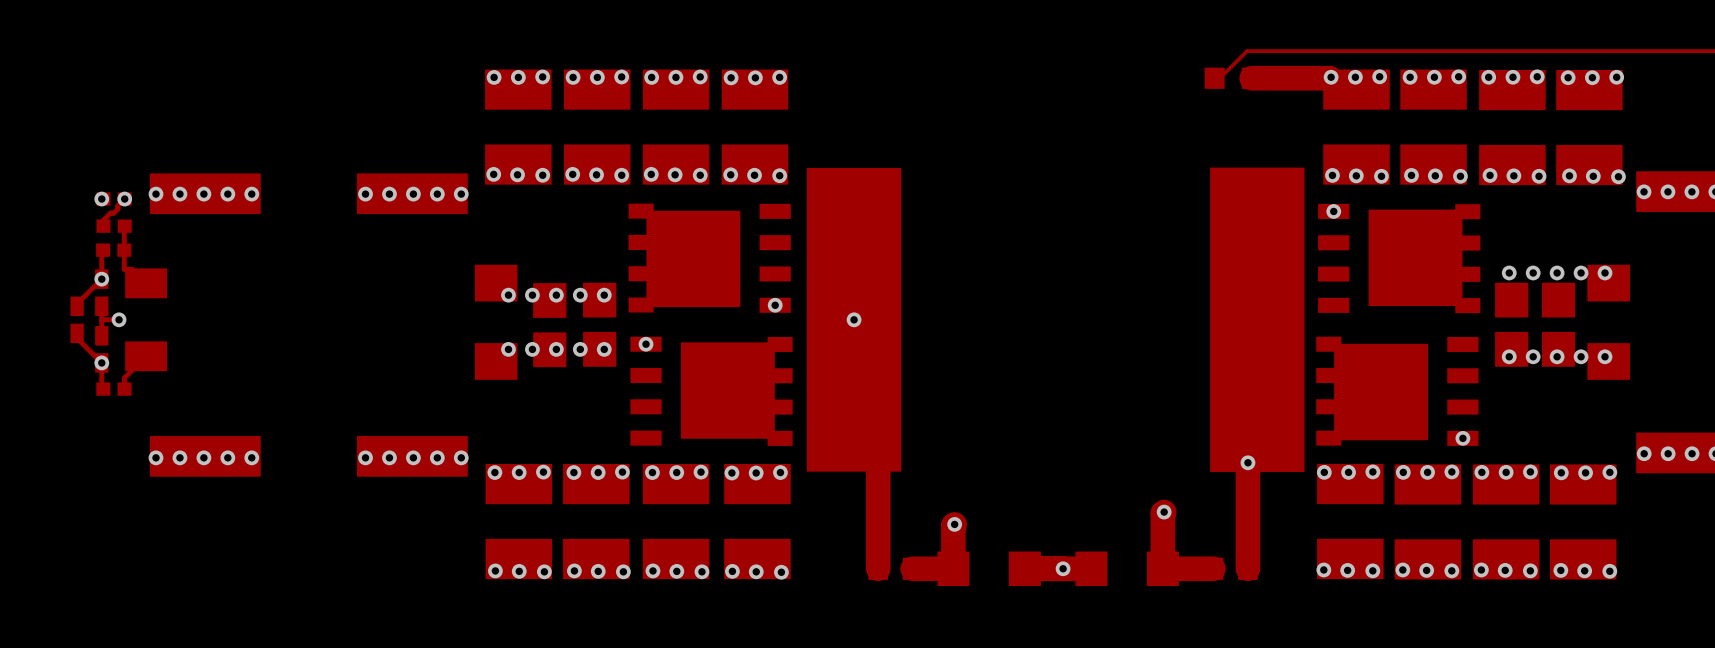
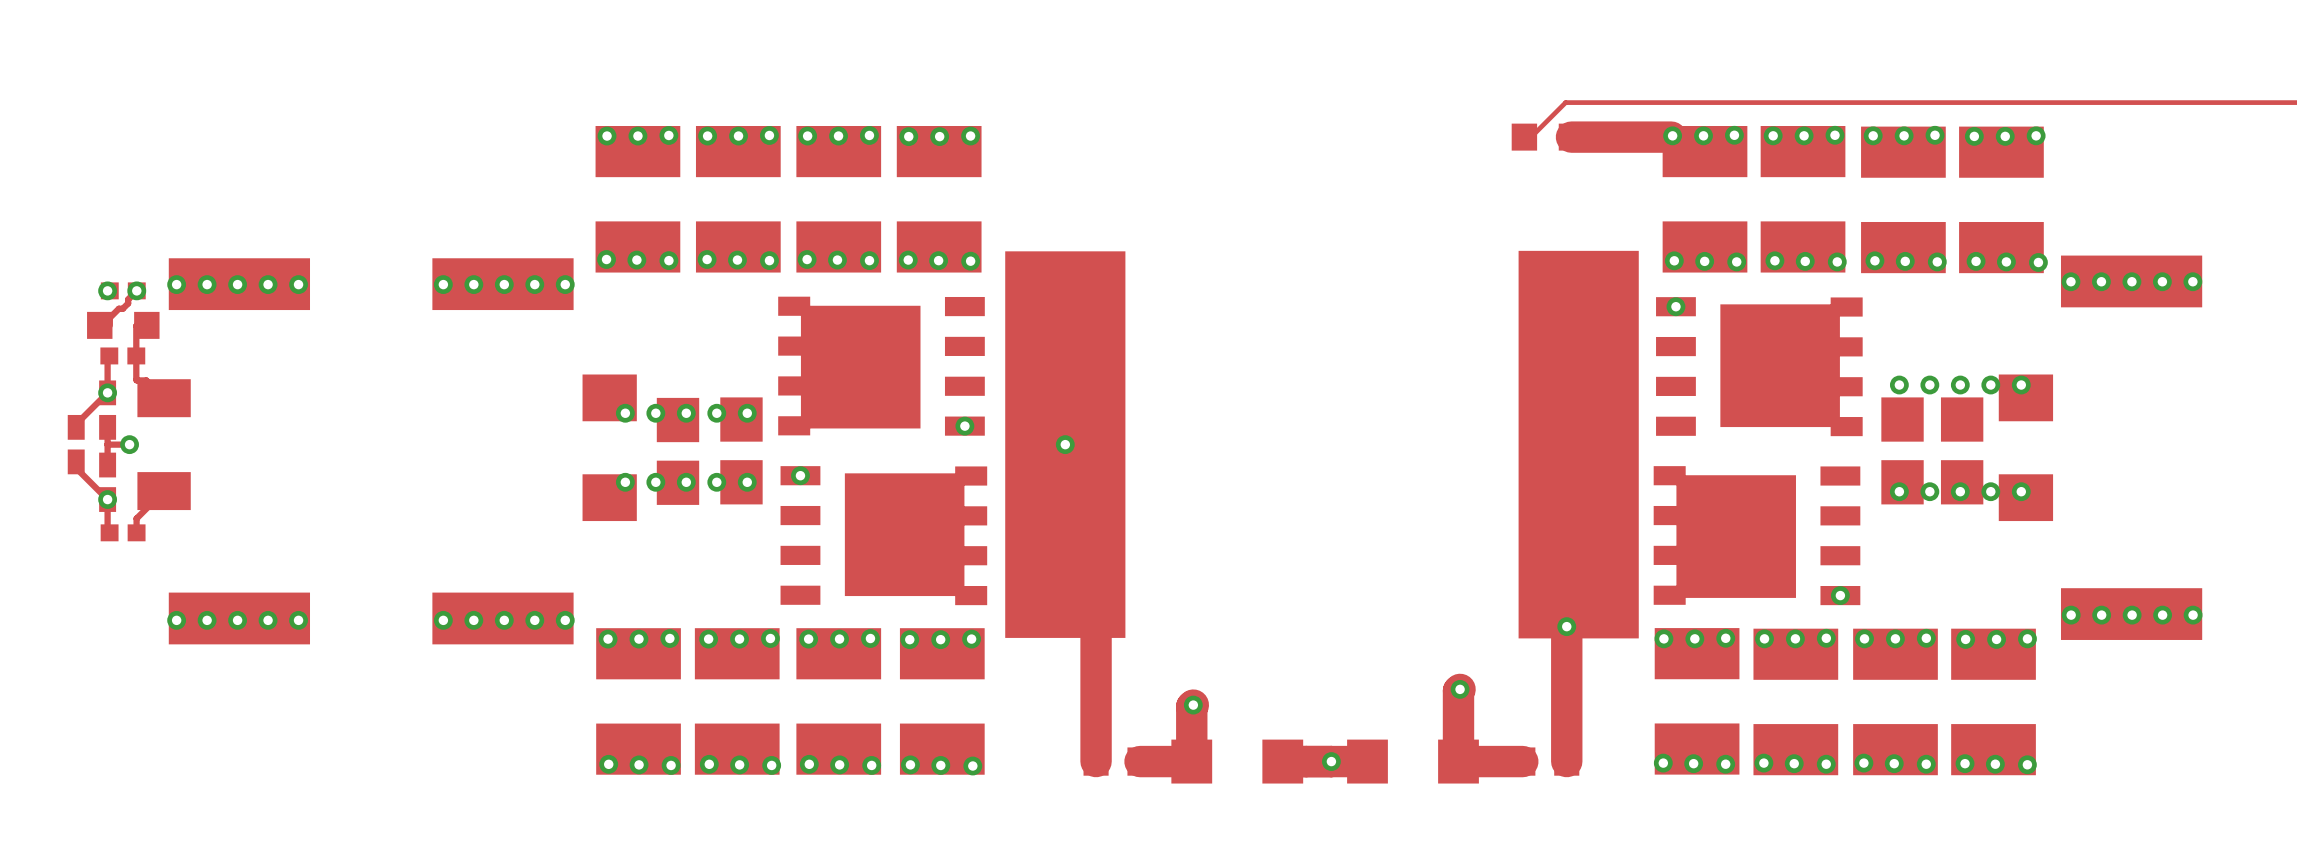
part footprint: [96, 219, 132, 233] -> [87, 311, 160, 339]

